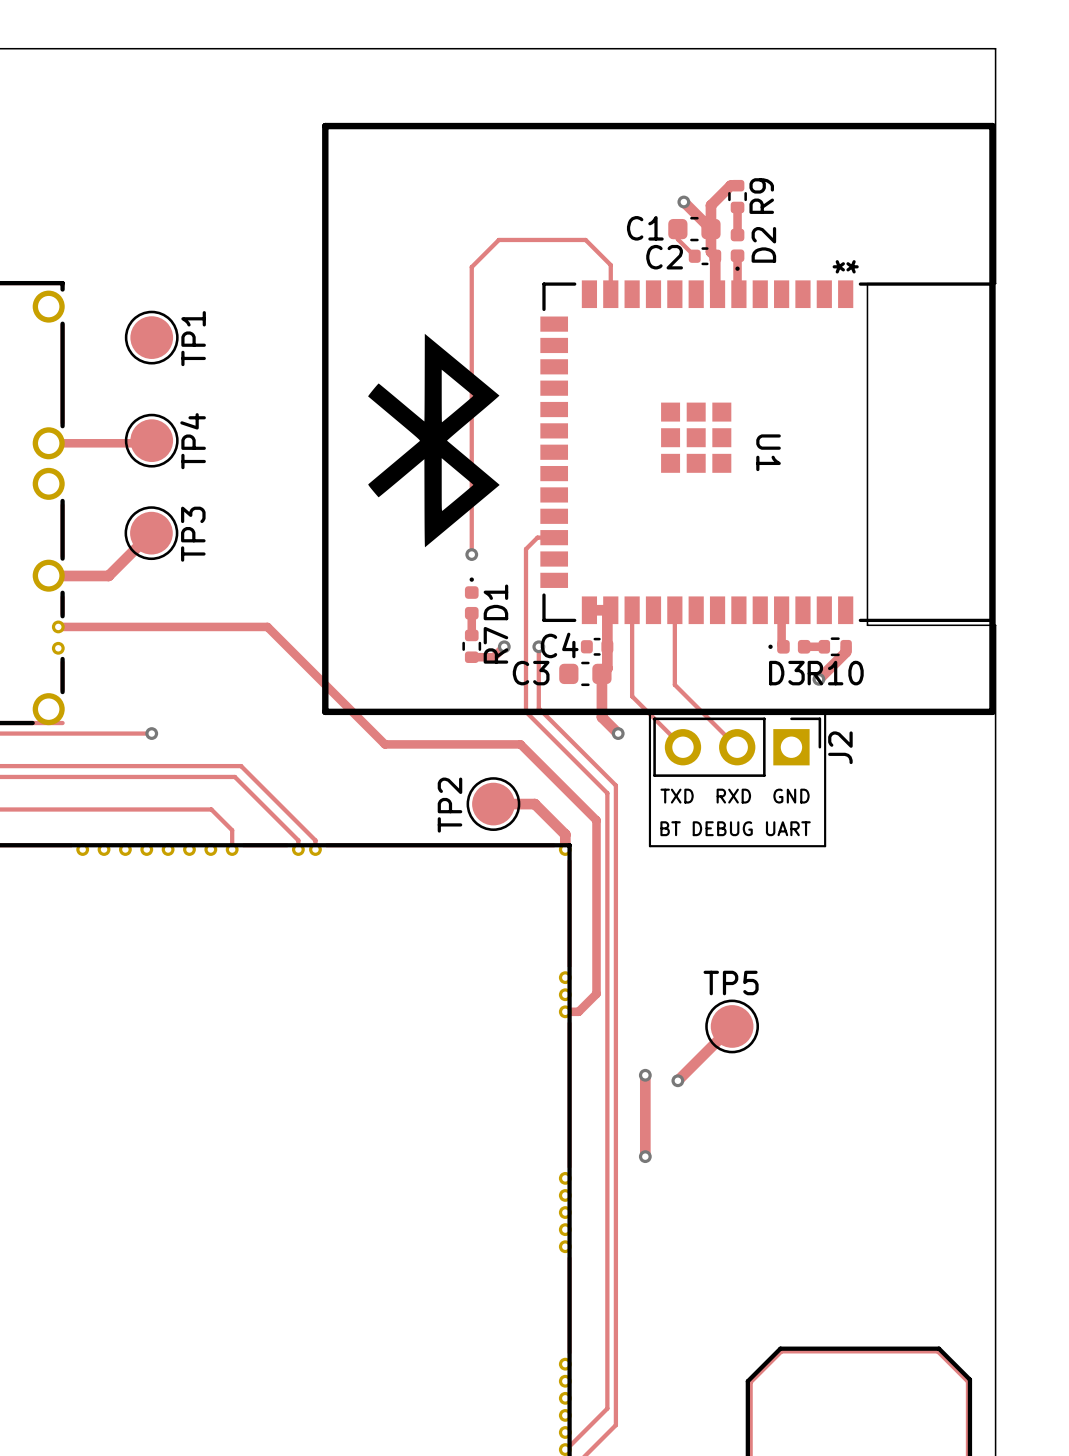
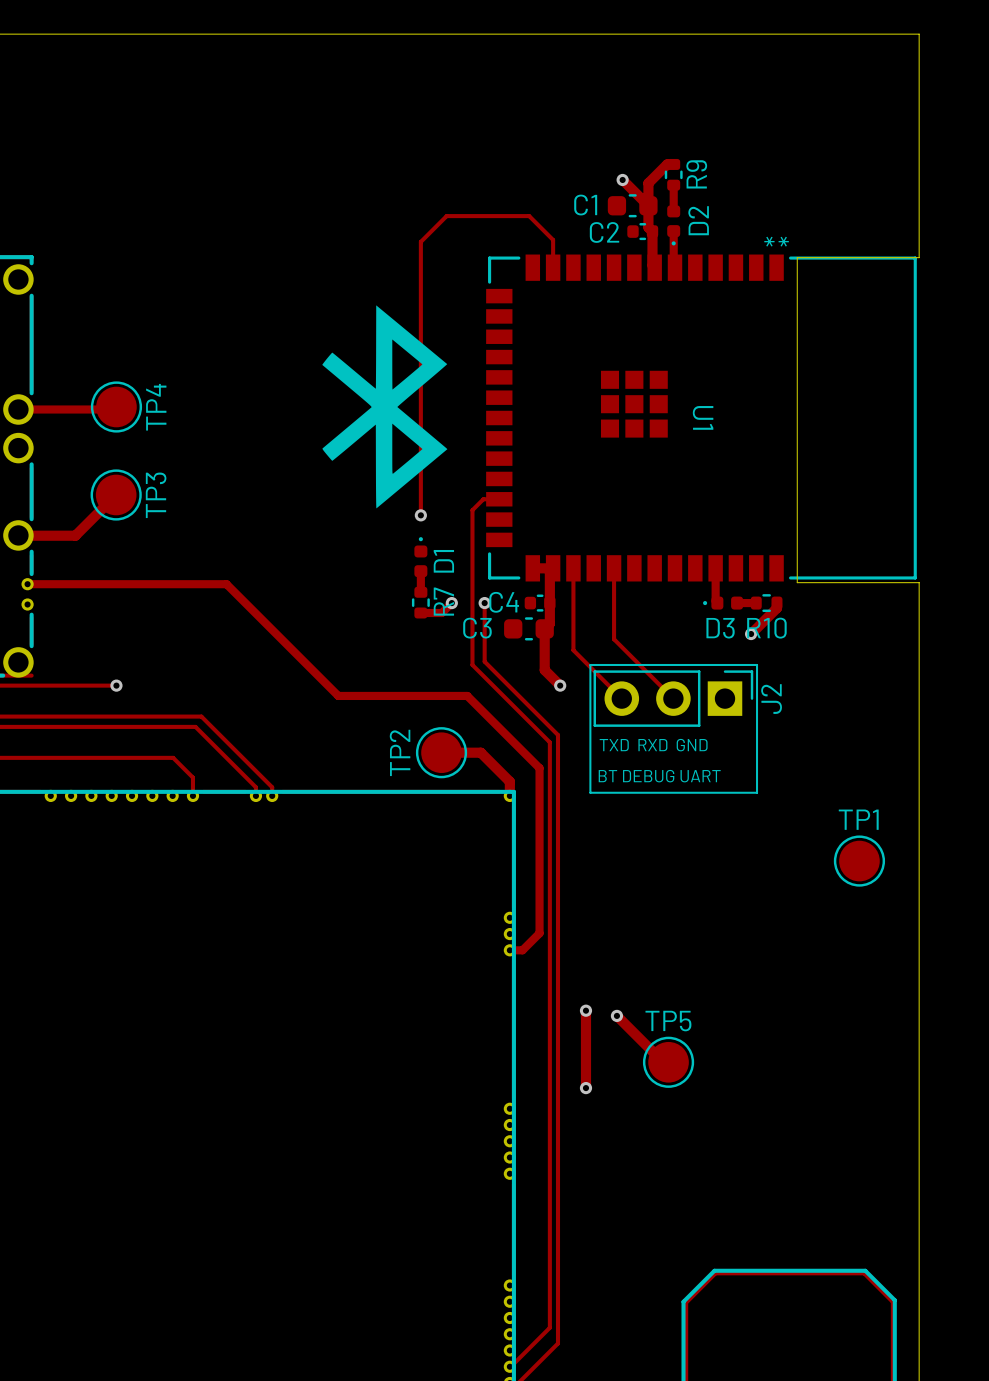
line: (325, 126) (992, 126) (992, 711) (325, 711) (325, 126) -> none
track: (677, 229) (677, 239) (694, 256) -> none
TP1 position: (151, 337) -> (859, 861)
TP1 name rotation: 0° (193, 338) -> 90° clockwise (858, 819)
track: (732, 1026) (677, 1080) -> (668, 1062) (663, 1062) (616, 1015)
TP5 position: (732, 1026) -> (668, 1062)

